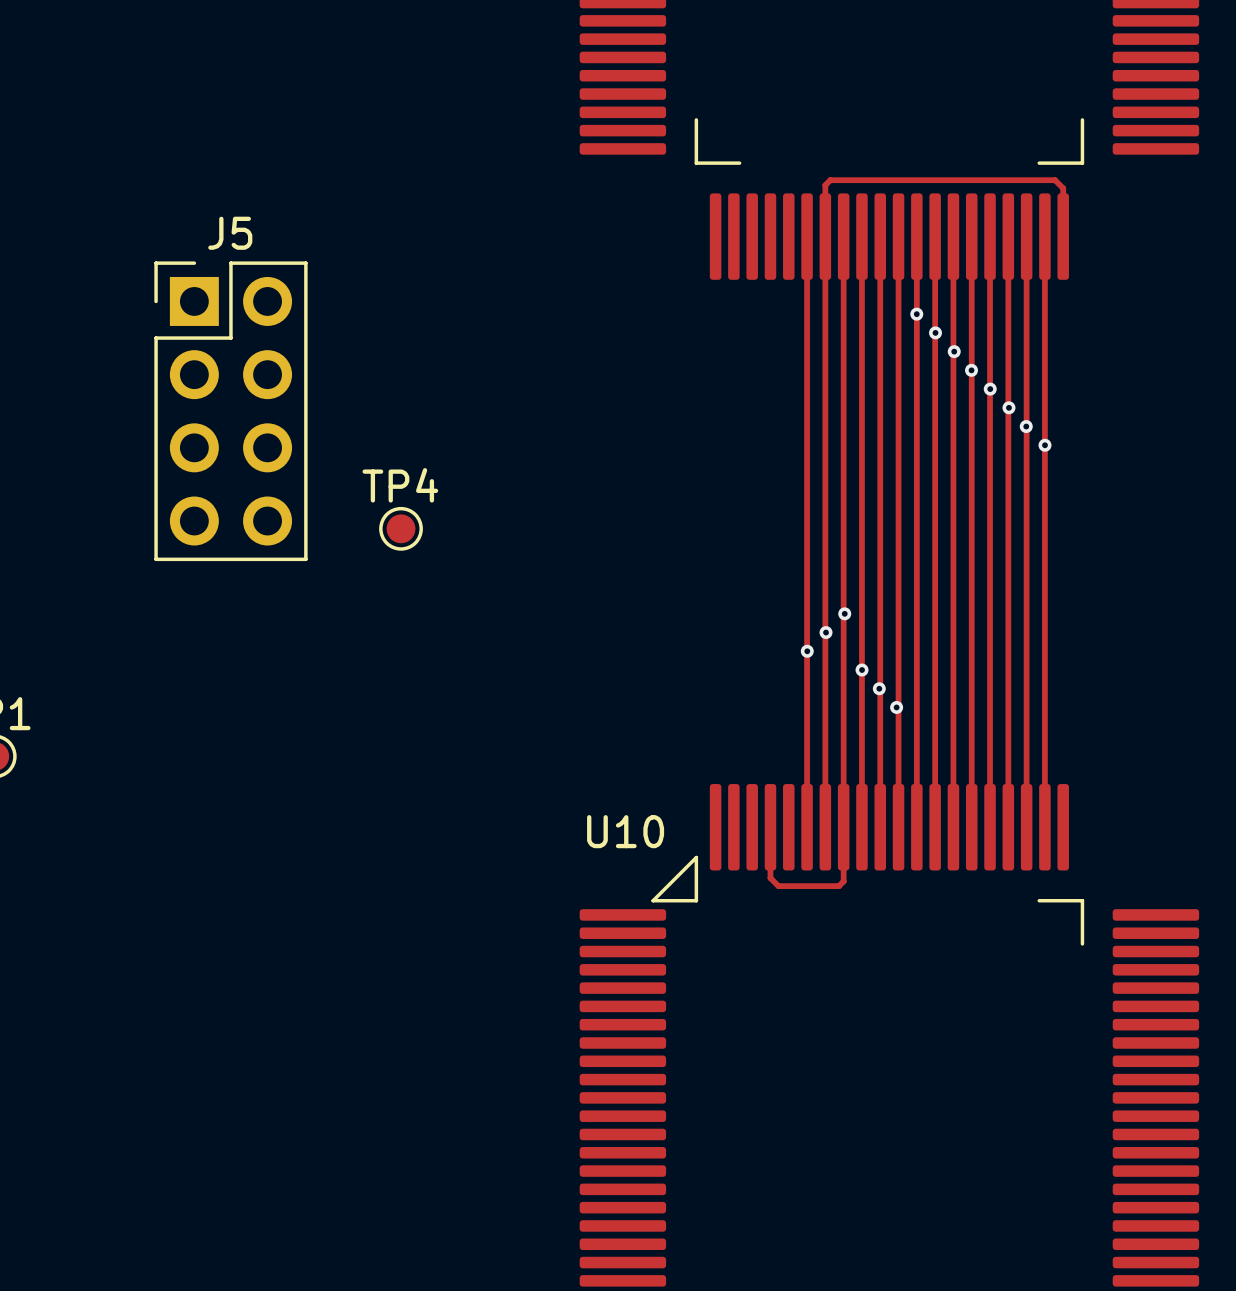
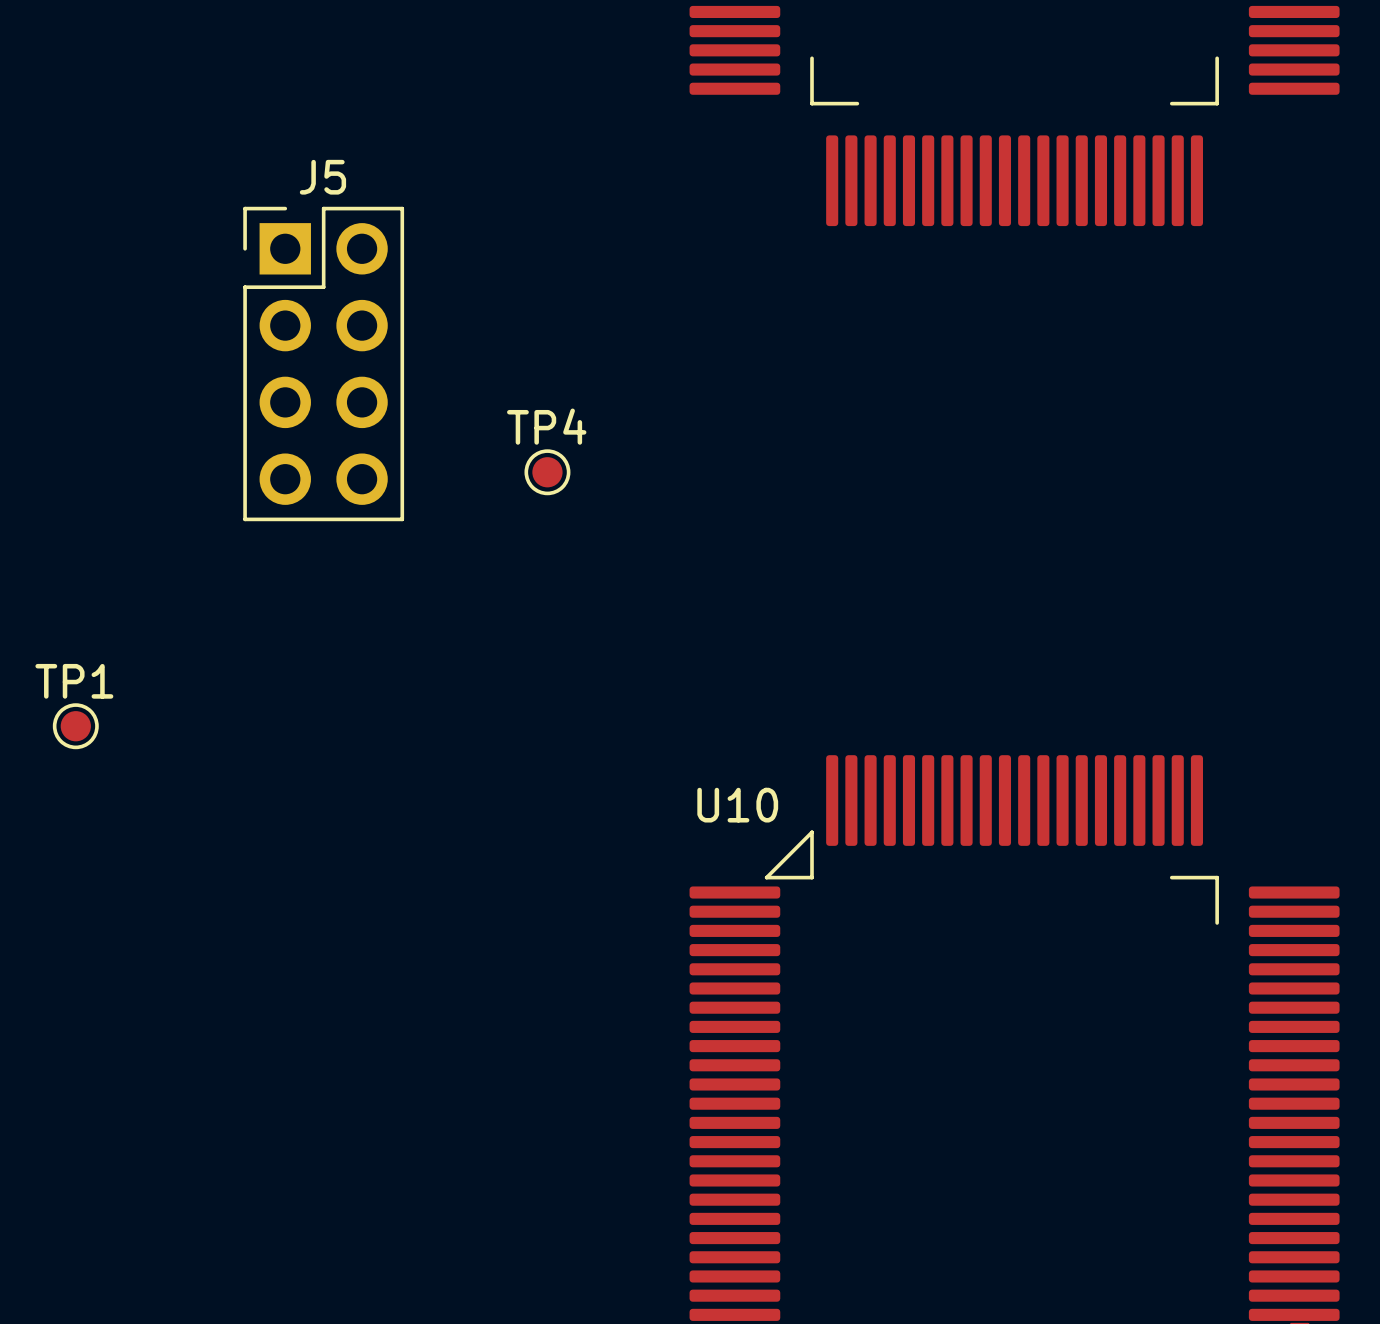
track: (807, 236) (807, 827) -> none
track: (843, 236) (843, 881) (838, 886) (778, 886) (770, 878) (770, 827) -> none
track: (861, 236) (861, 827) -> none
track: (880, 236) (880, 827) -> none
track: (898, 236) (898, 827) -> none
track: (916, 236) (916, 827) -> none
track: (935, 236) (935, 827) -> none
track: (953, 236) (953, 827) -> none
track: (971, 236) (971, 827) -> none
track: (990, 236) (990, 827) -> none
track: (1008, 236) (1008, 827) -> none
track: (1026, 236) (1026, 827) -> none
track: (1044, 236) (1044, 827) -> none
track: (1063, 236) (1063, 188) (1055, 180) (830, 180) (825, 185) (825, 827) -> none
via: (916, 314) -> none
via: (935, 332) -> none
via: (954, 351) -> none
via: (971, 370) -> none
via: (990, 389) -> none
via: (1008, 407) -> none
via: (1026, 426) -> none
via: (1044, 445) -> none
TP4 position: (401, 528) -> (547, 472)
via: (844, 613) -> none
via: (826, 632) -> none
via: (807, 651) -> none
via: (862, 670) -> none
via: (879, 688) -> none
via: (896, 707) -> none

